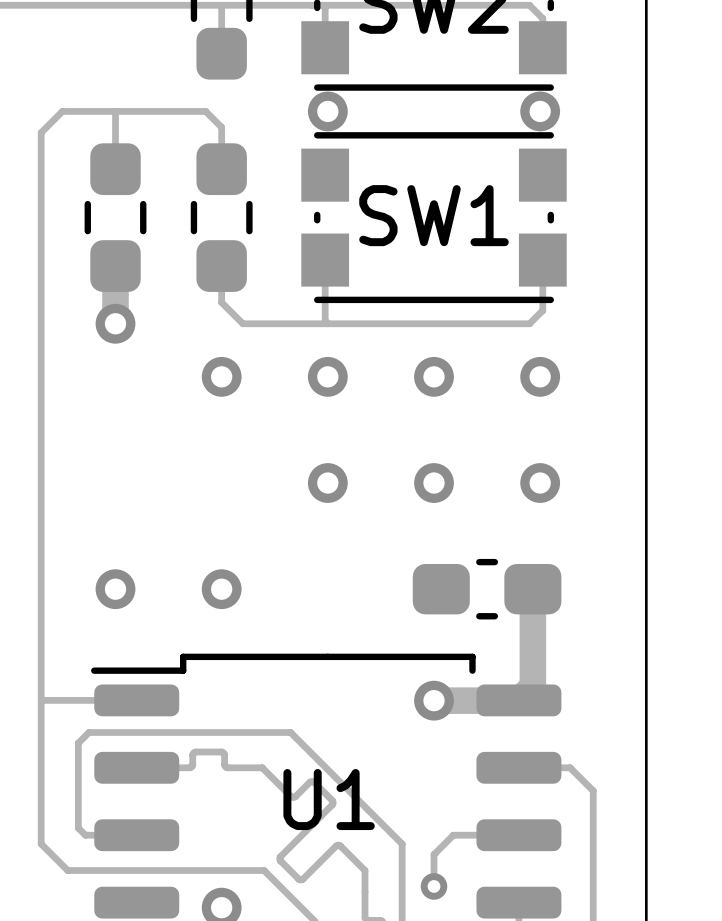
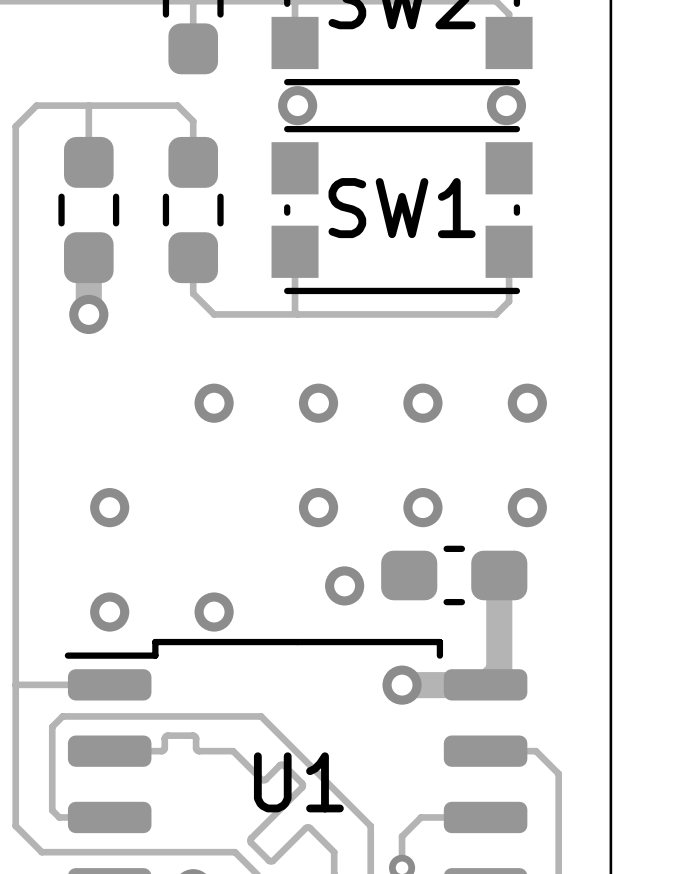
via position: (221, 376) -> (214, 403)
via position: (327, 376) -> (318, 403)
via position: (434, 376) -> (422, 403)
via position: (540, 376) -> (527, 403)
via position: (327, 483) -> (318, 507)
via position: (434, 483) -> (422, 507)
via position: (540, 483) -> (527, 507)
via: none -> (109, 507)
via position: (115, 589) -> (109, 612)
via position: (221, 589) -> (214, 612)
via: none -> (344, 585)

